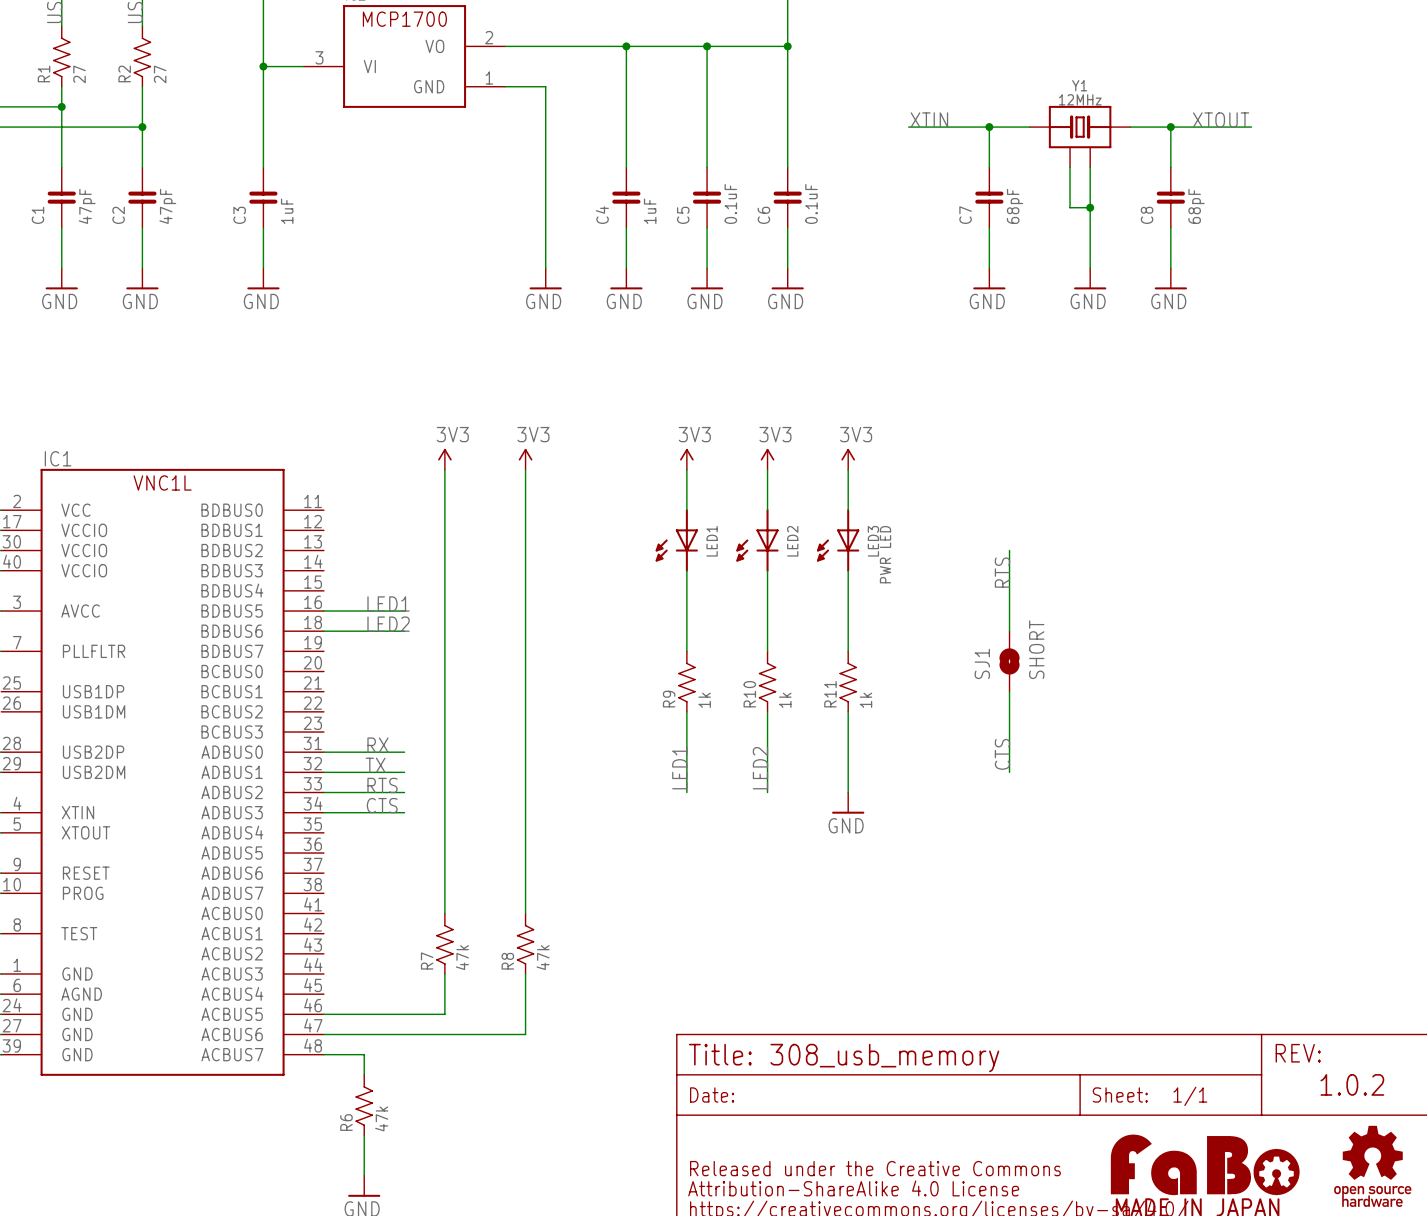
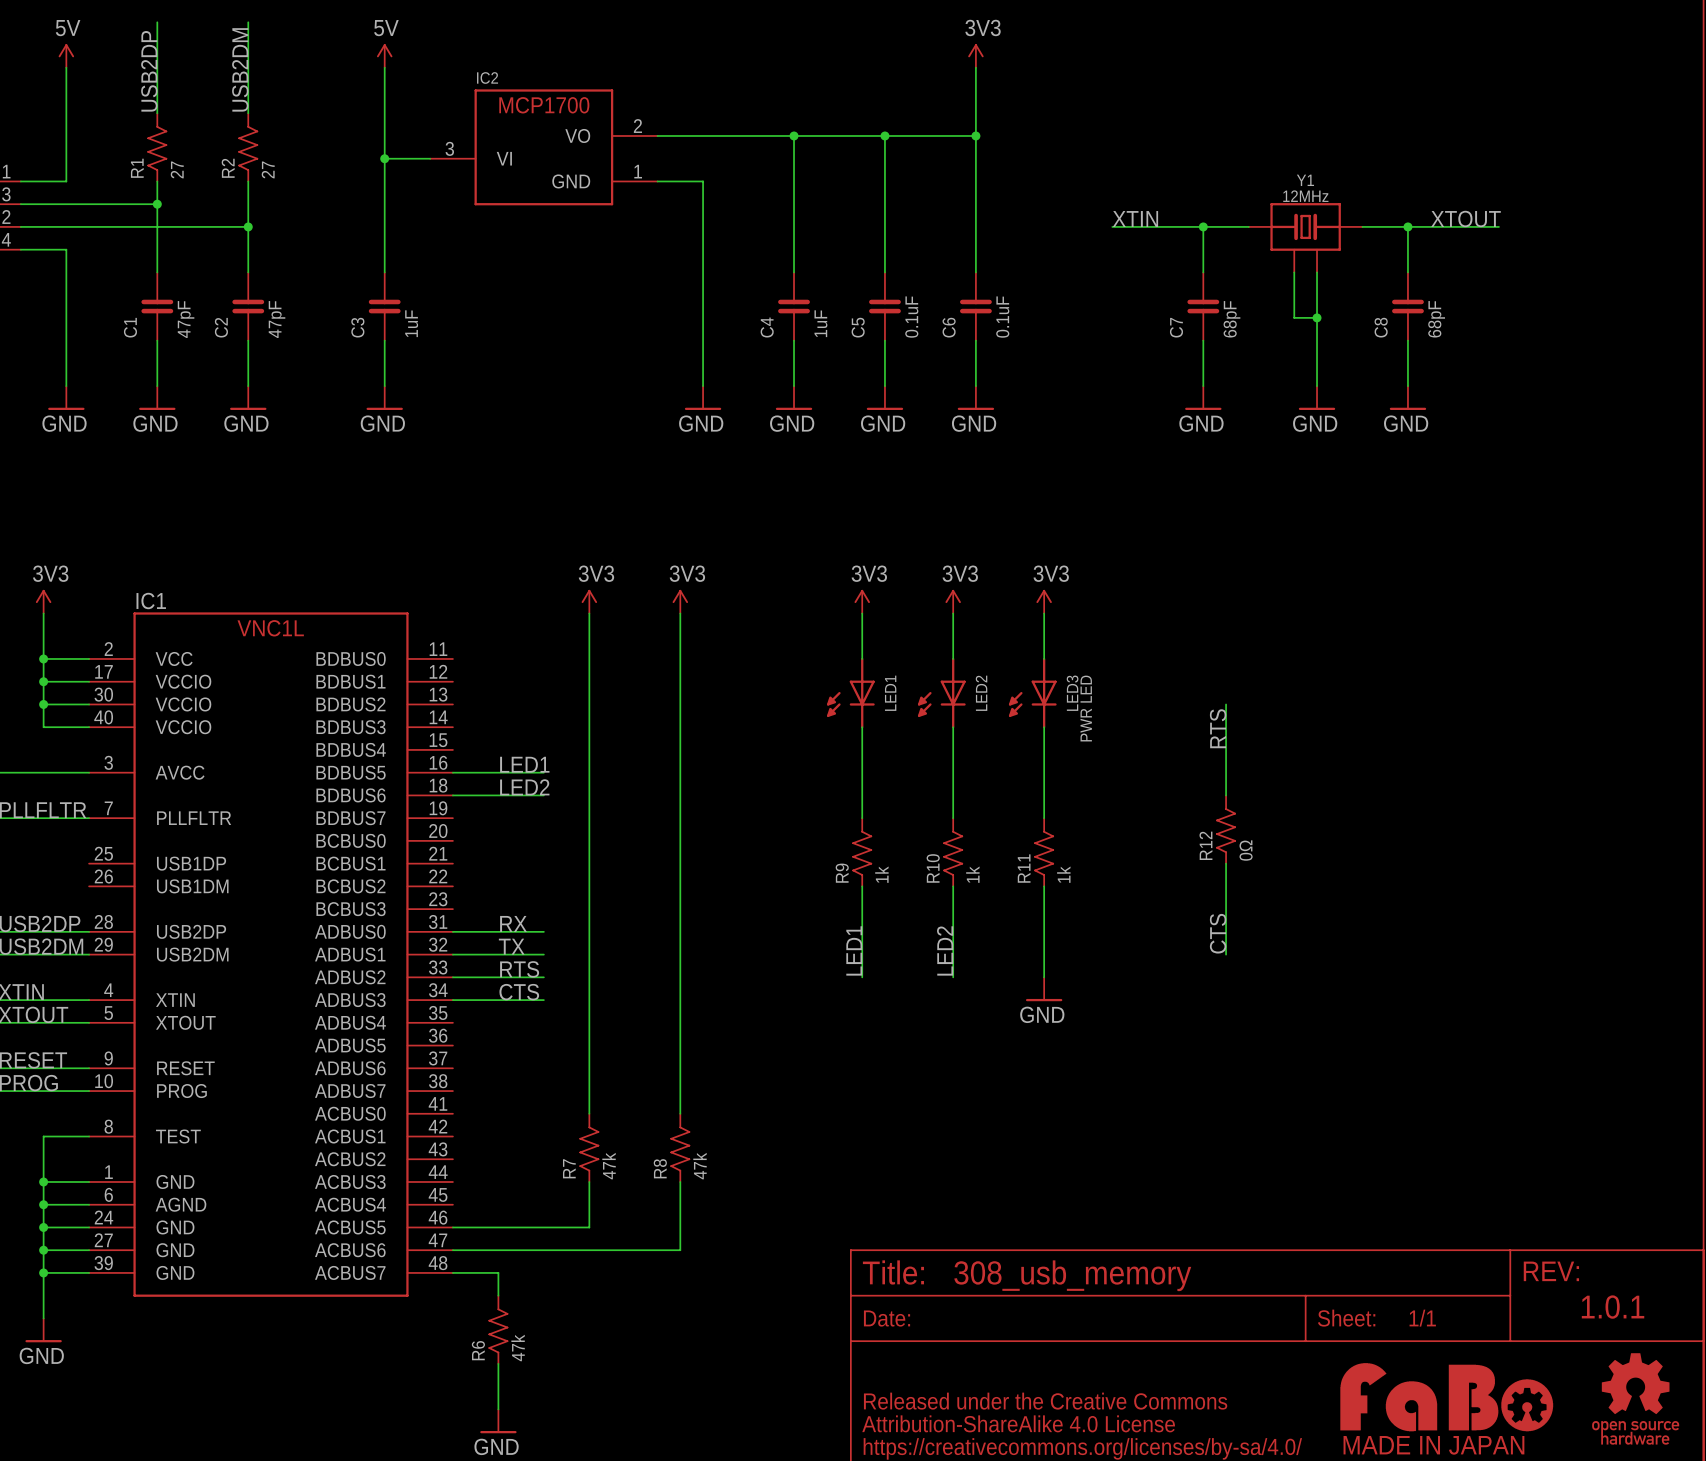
SJ1: SHORT (1009, 661) -> none
R12: none -> 0Ω (1226, 829)
text: 1.0.2 (1352, 1084) -> 1.0.1 (1613, 1307)

